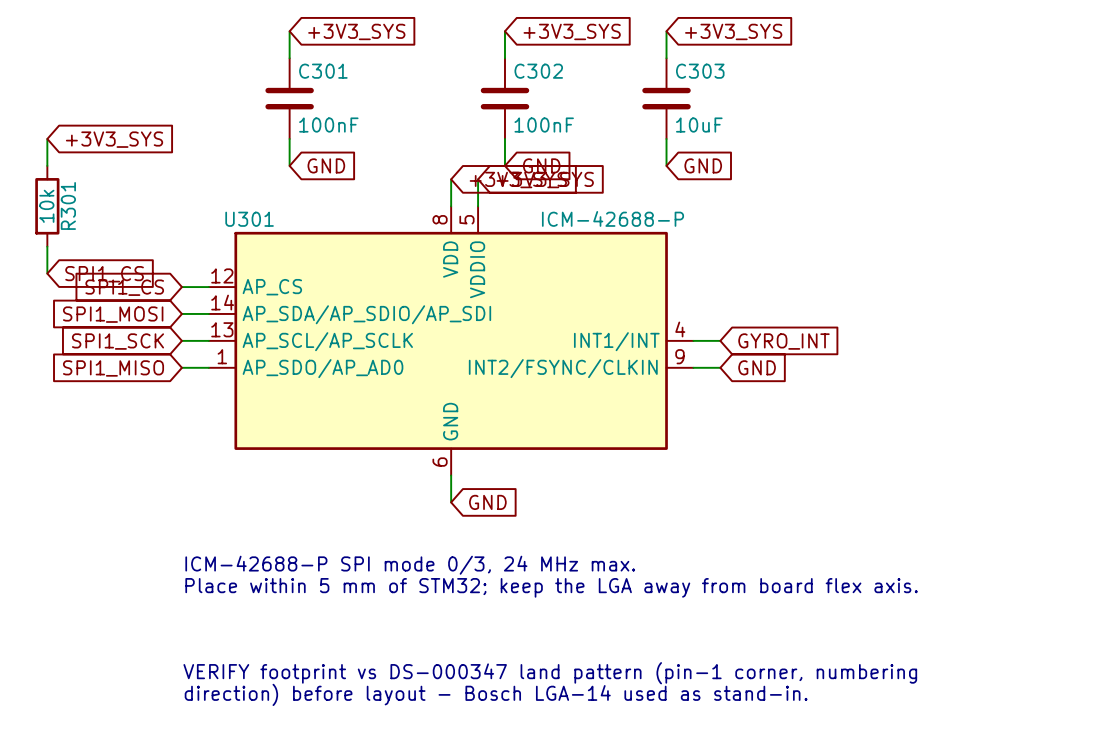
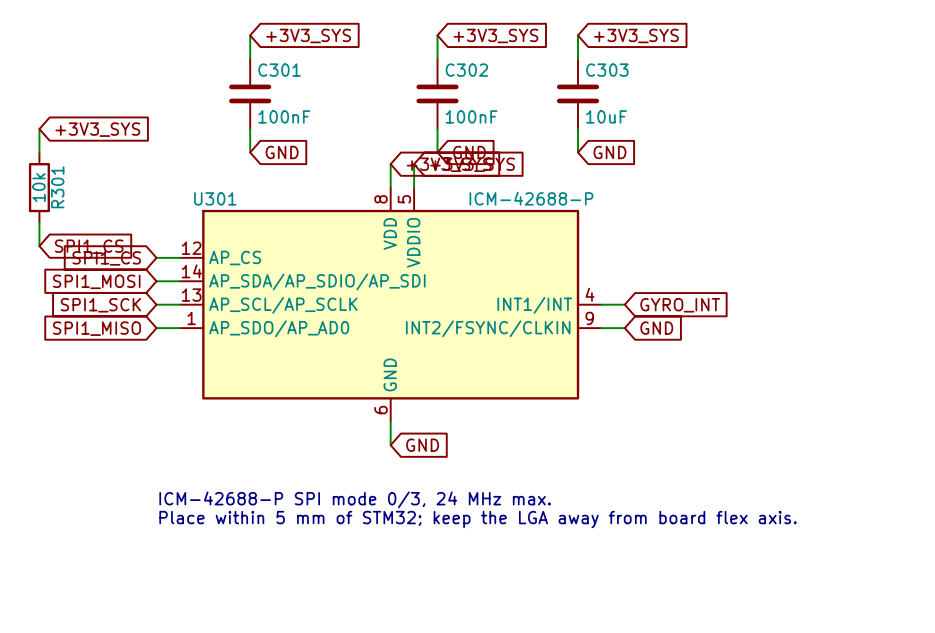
text: VERIFY footprint vs DS-000347 land pattern (pin-1 corner, numbering (550, 673) -> none
text: direction) before layout - Bosch LGA-14 used as stand-in. (496, 694) -> none

